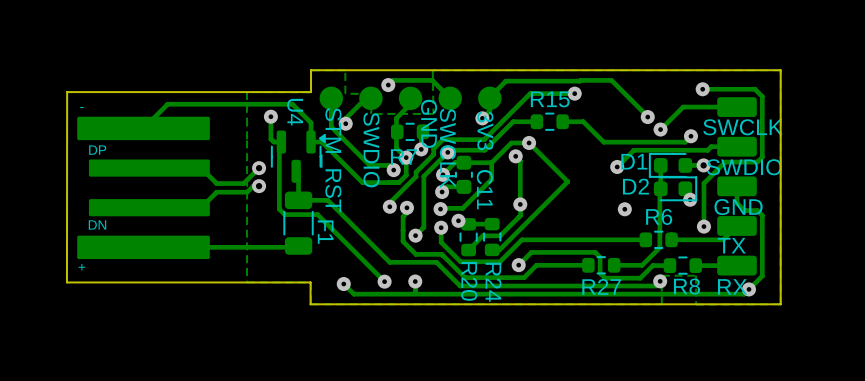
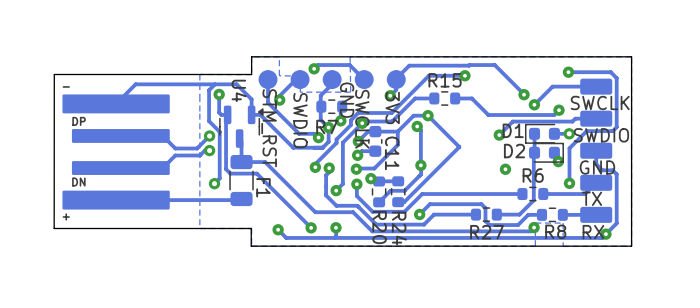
track: none -> (214, 84) (209, 90) (209, 121) (219, 131) (219, 178) (214, 183)
via: none -> (214, 183)

